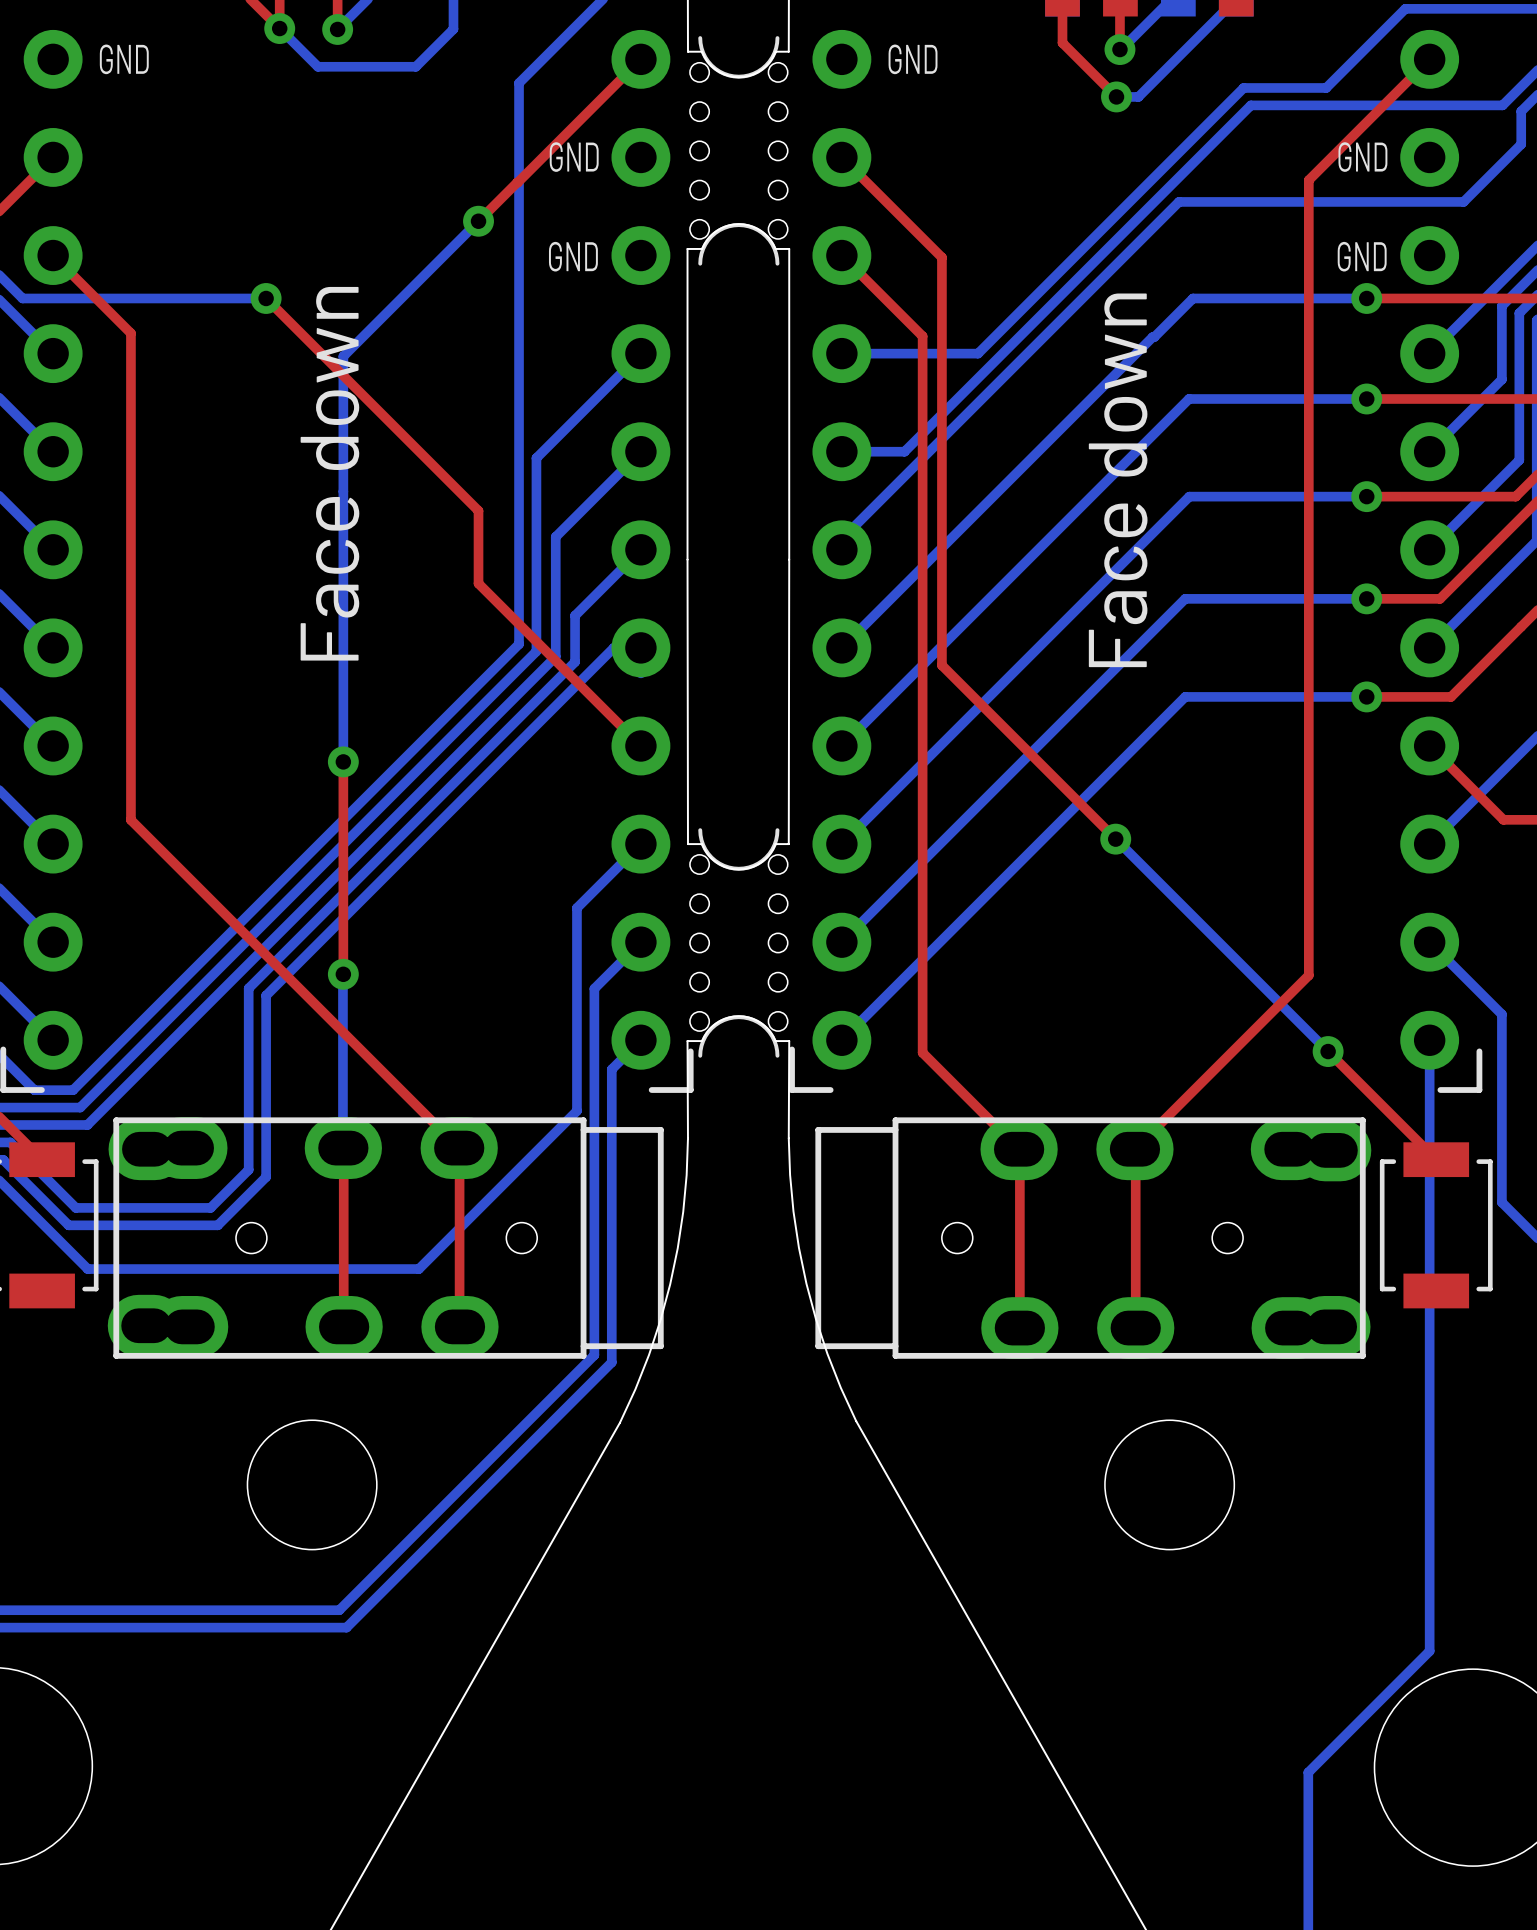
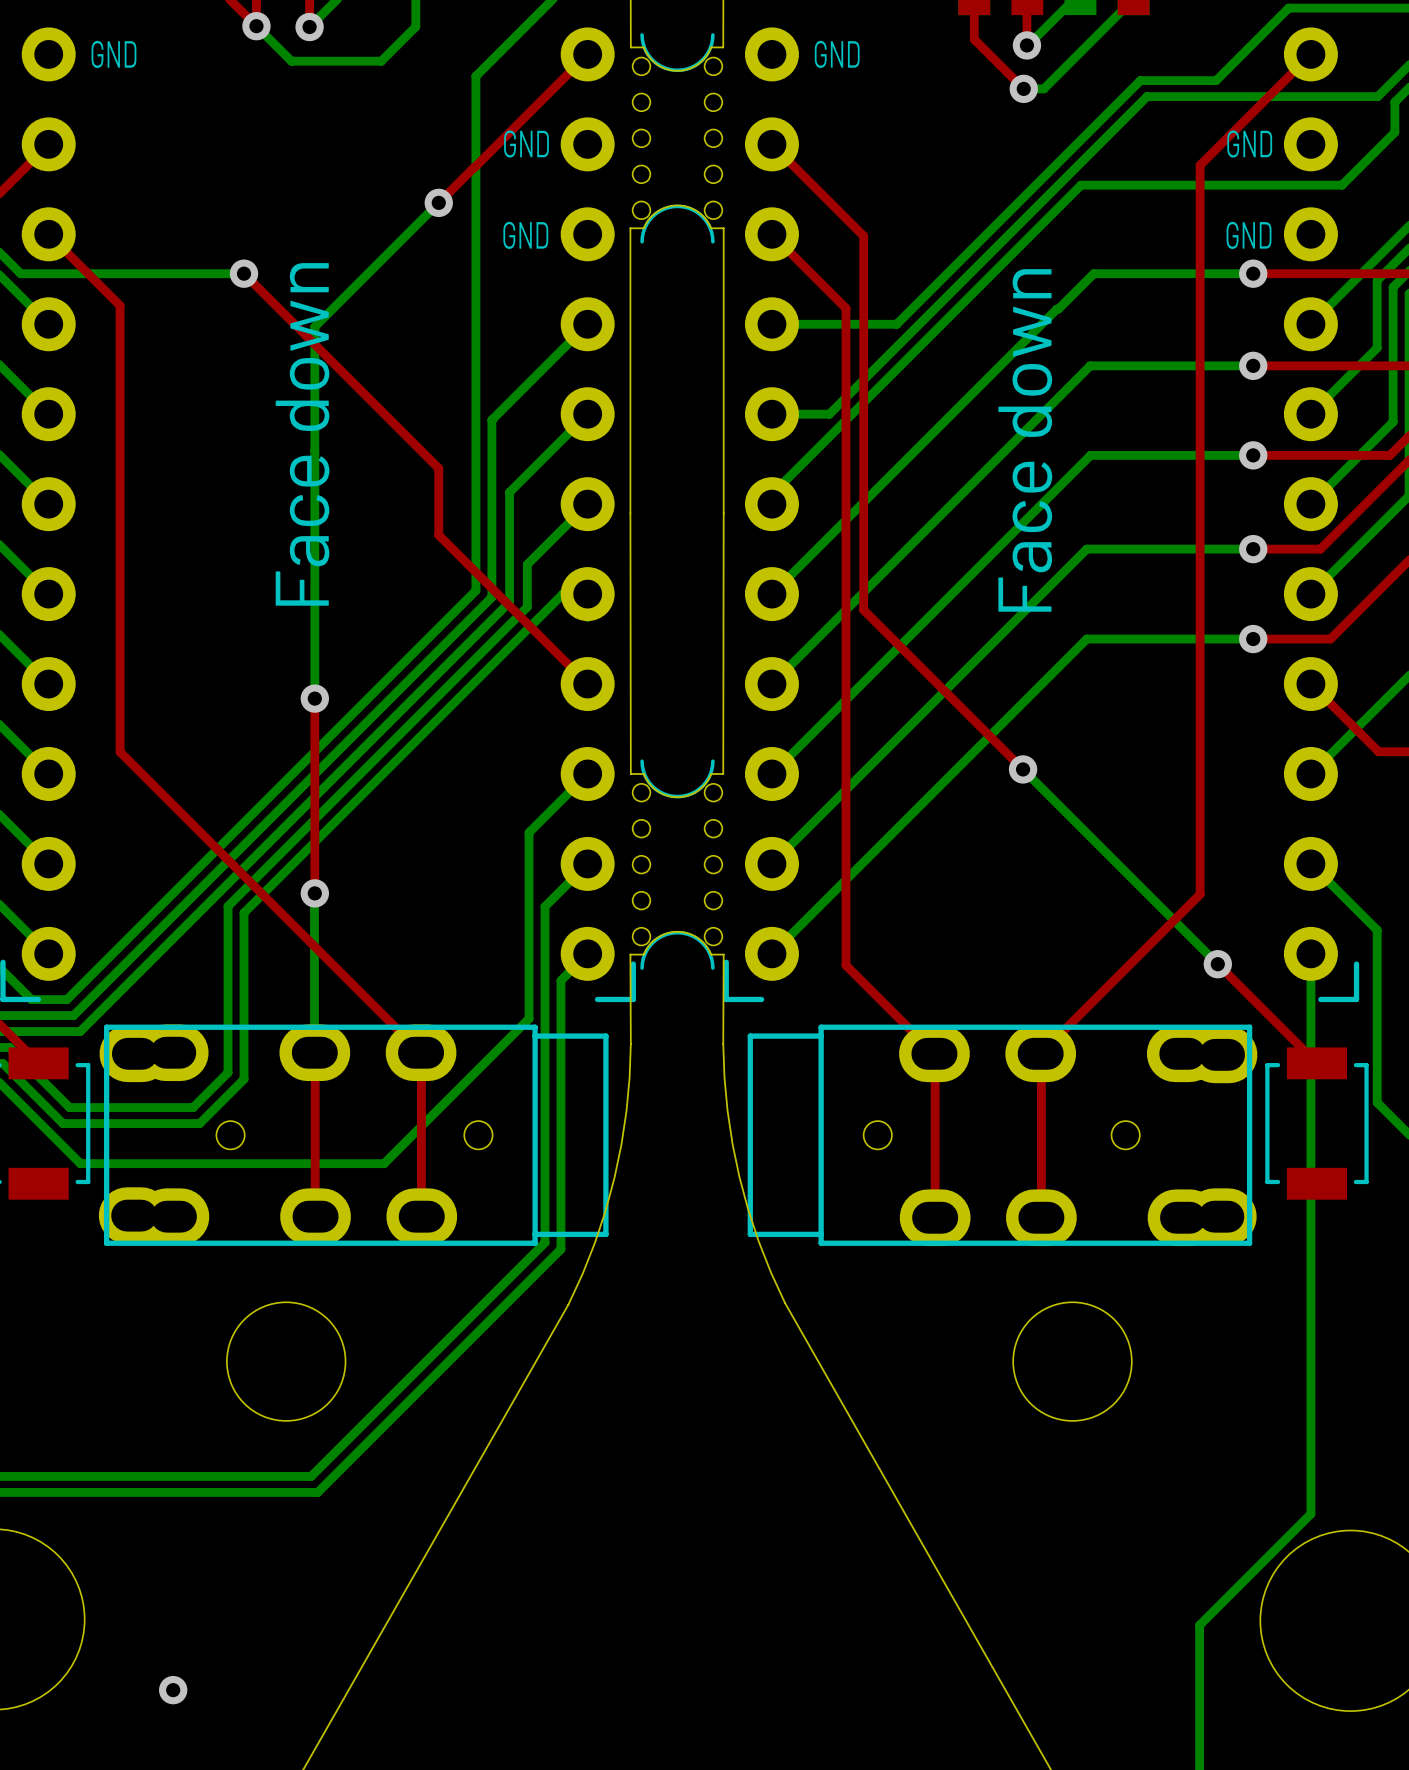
via: none -> (173, 1690)

